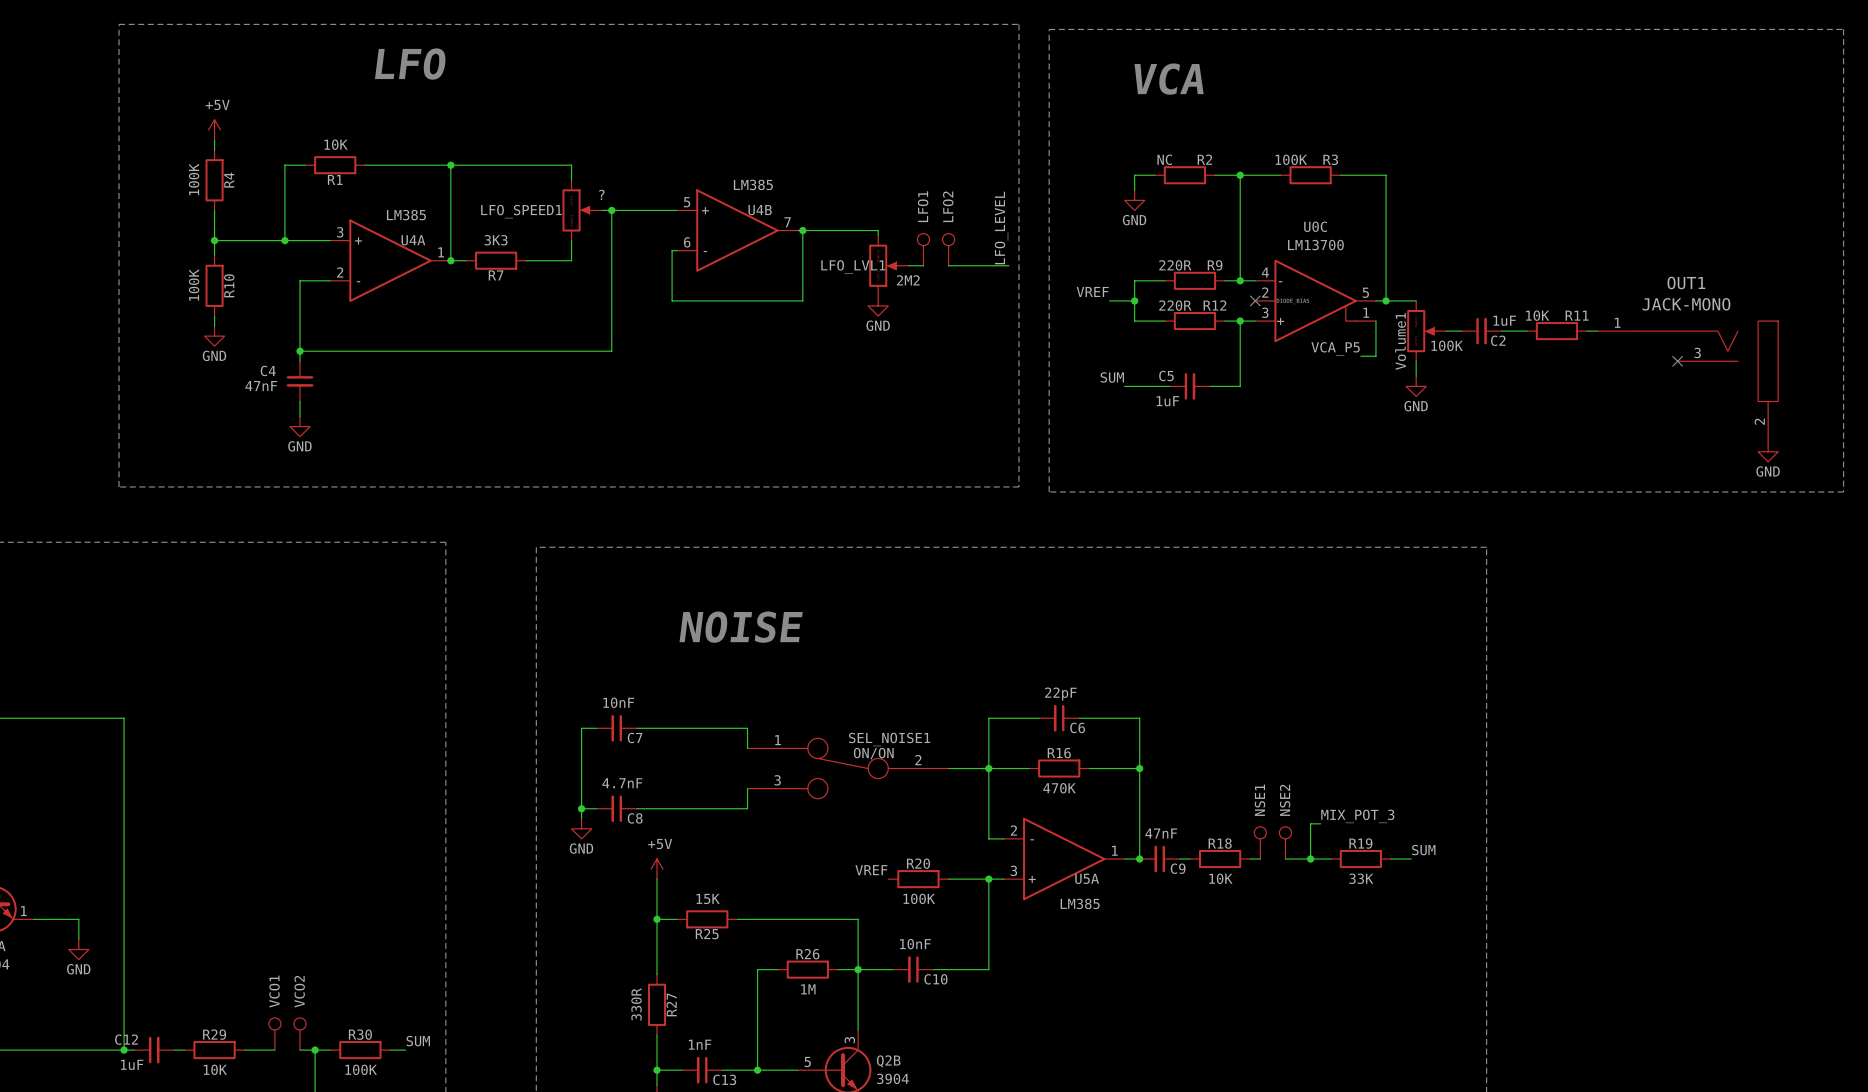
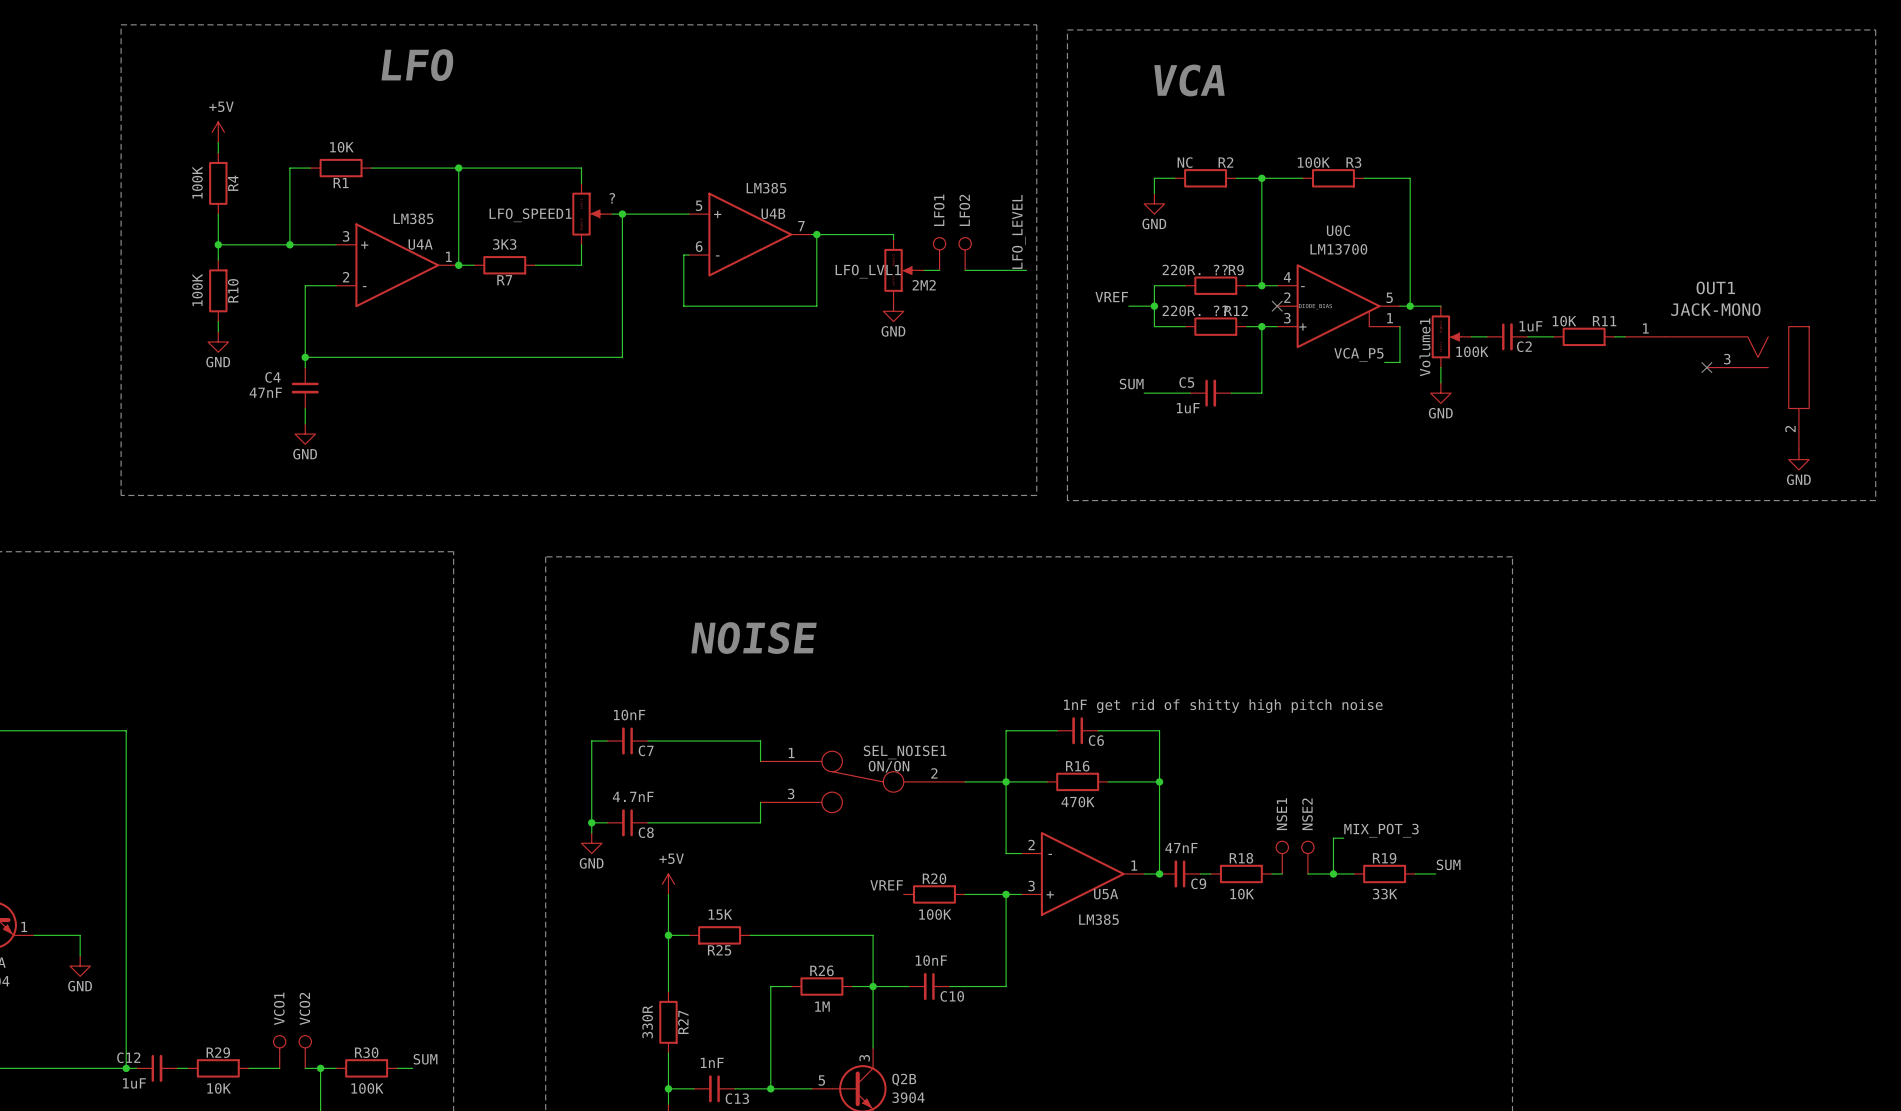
R9 value: 220R (1175, 265) -> 220R. ?? (1195, 270)
R12 value: 220R (1175, 305) -> 220R. ?? (1195, 310)
C6 value: 22pF (1060, 694) -> 1nF get rid of shitty high pitch noise (1223, 706)

